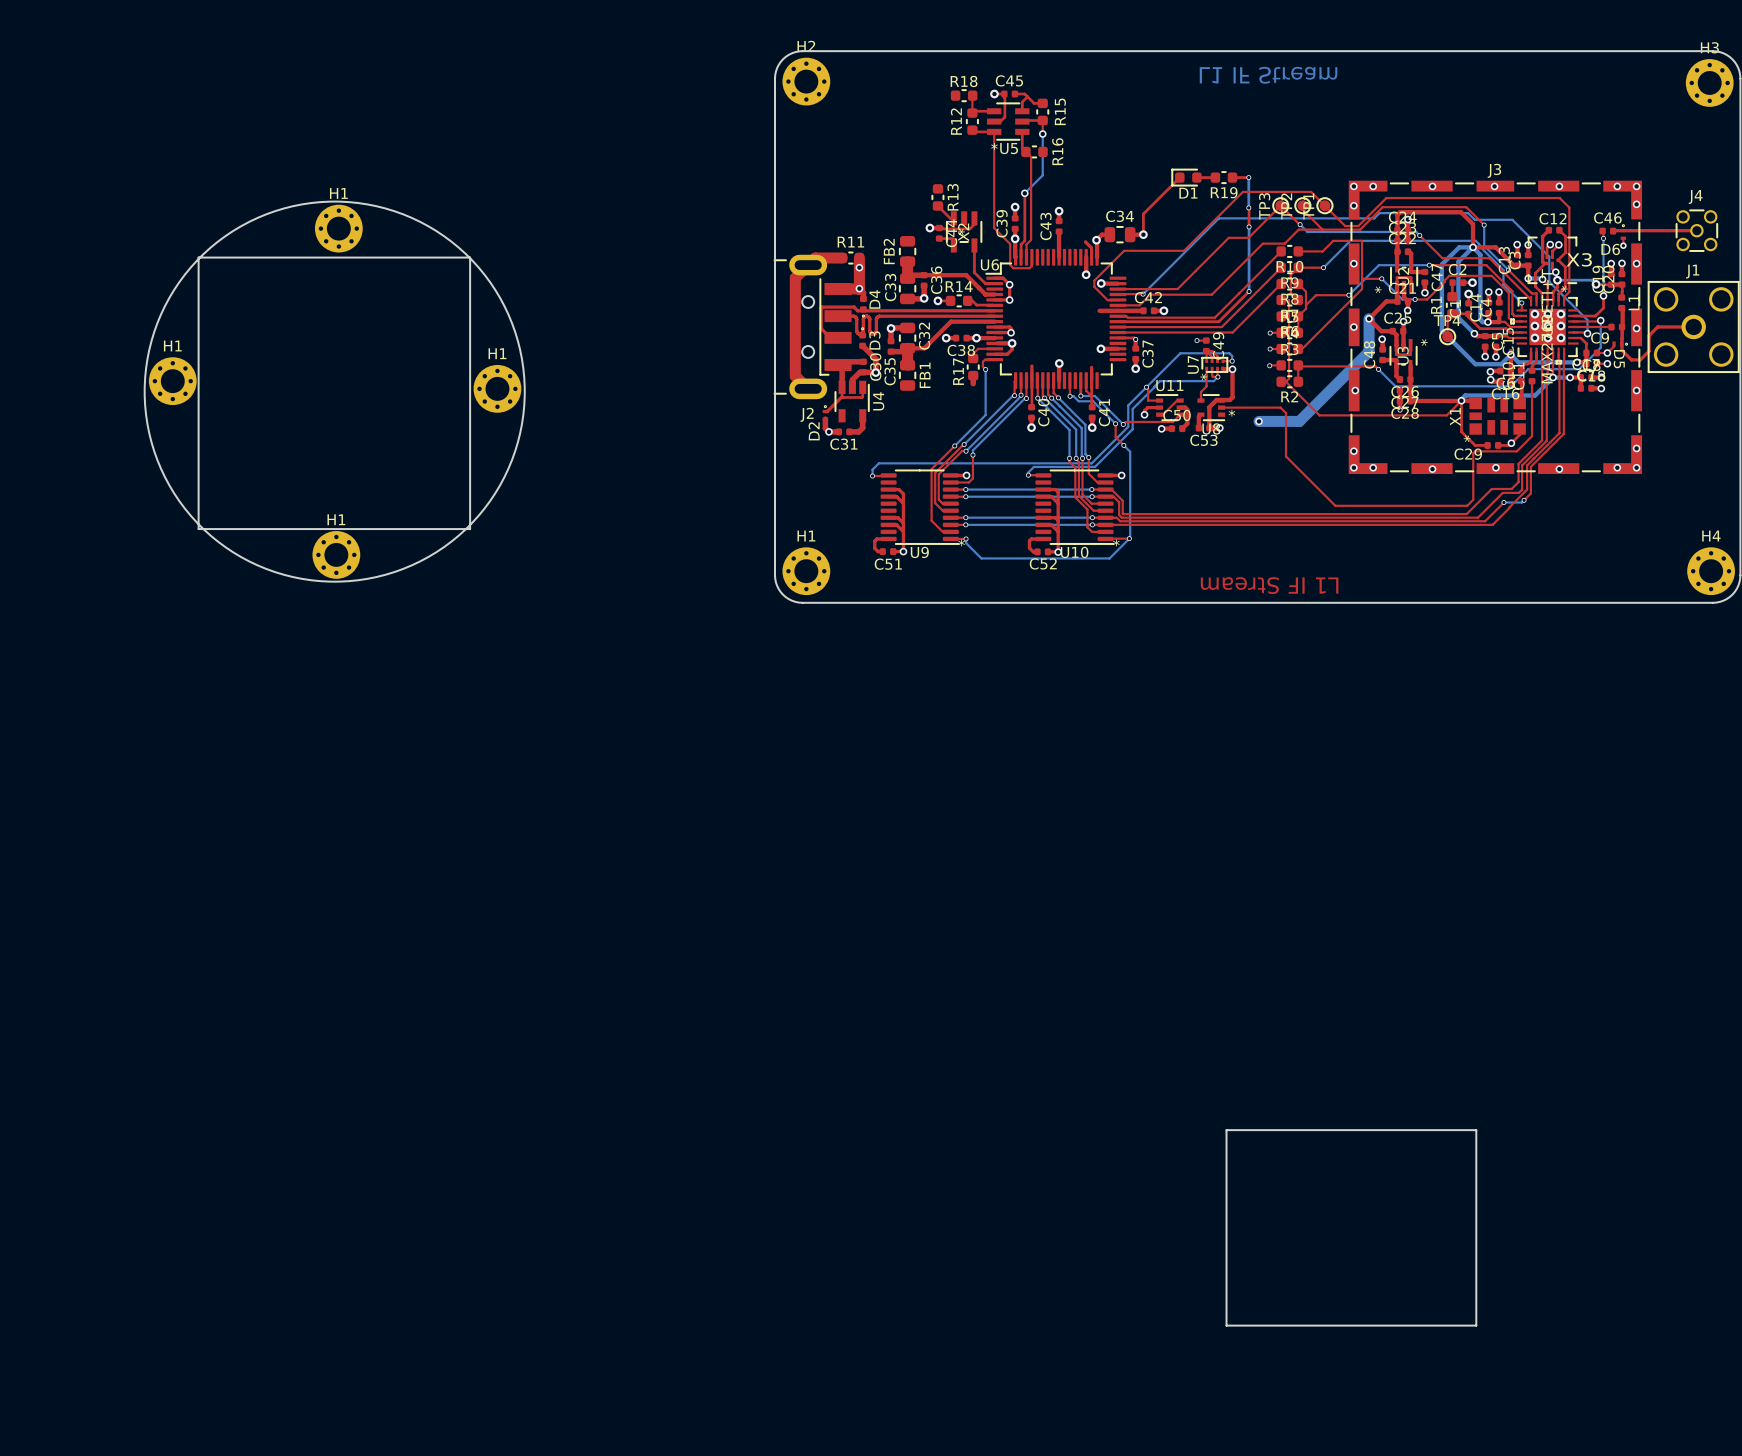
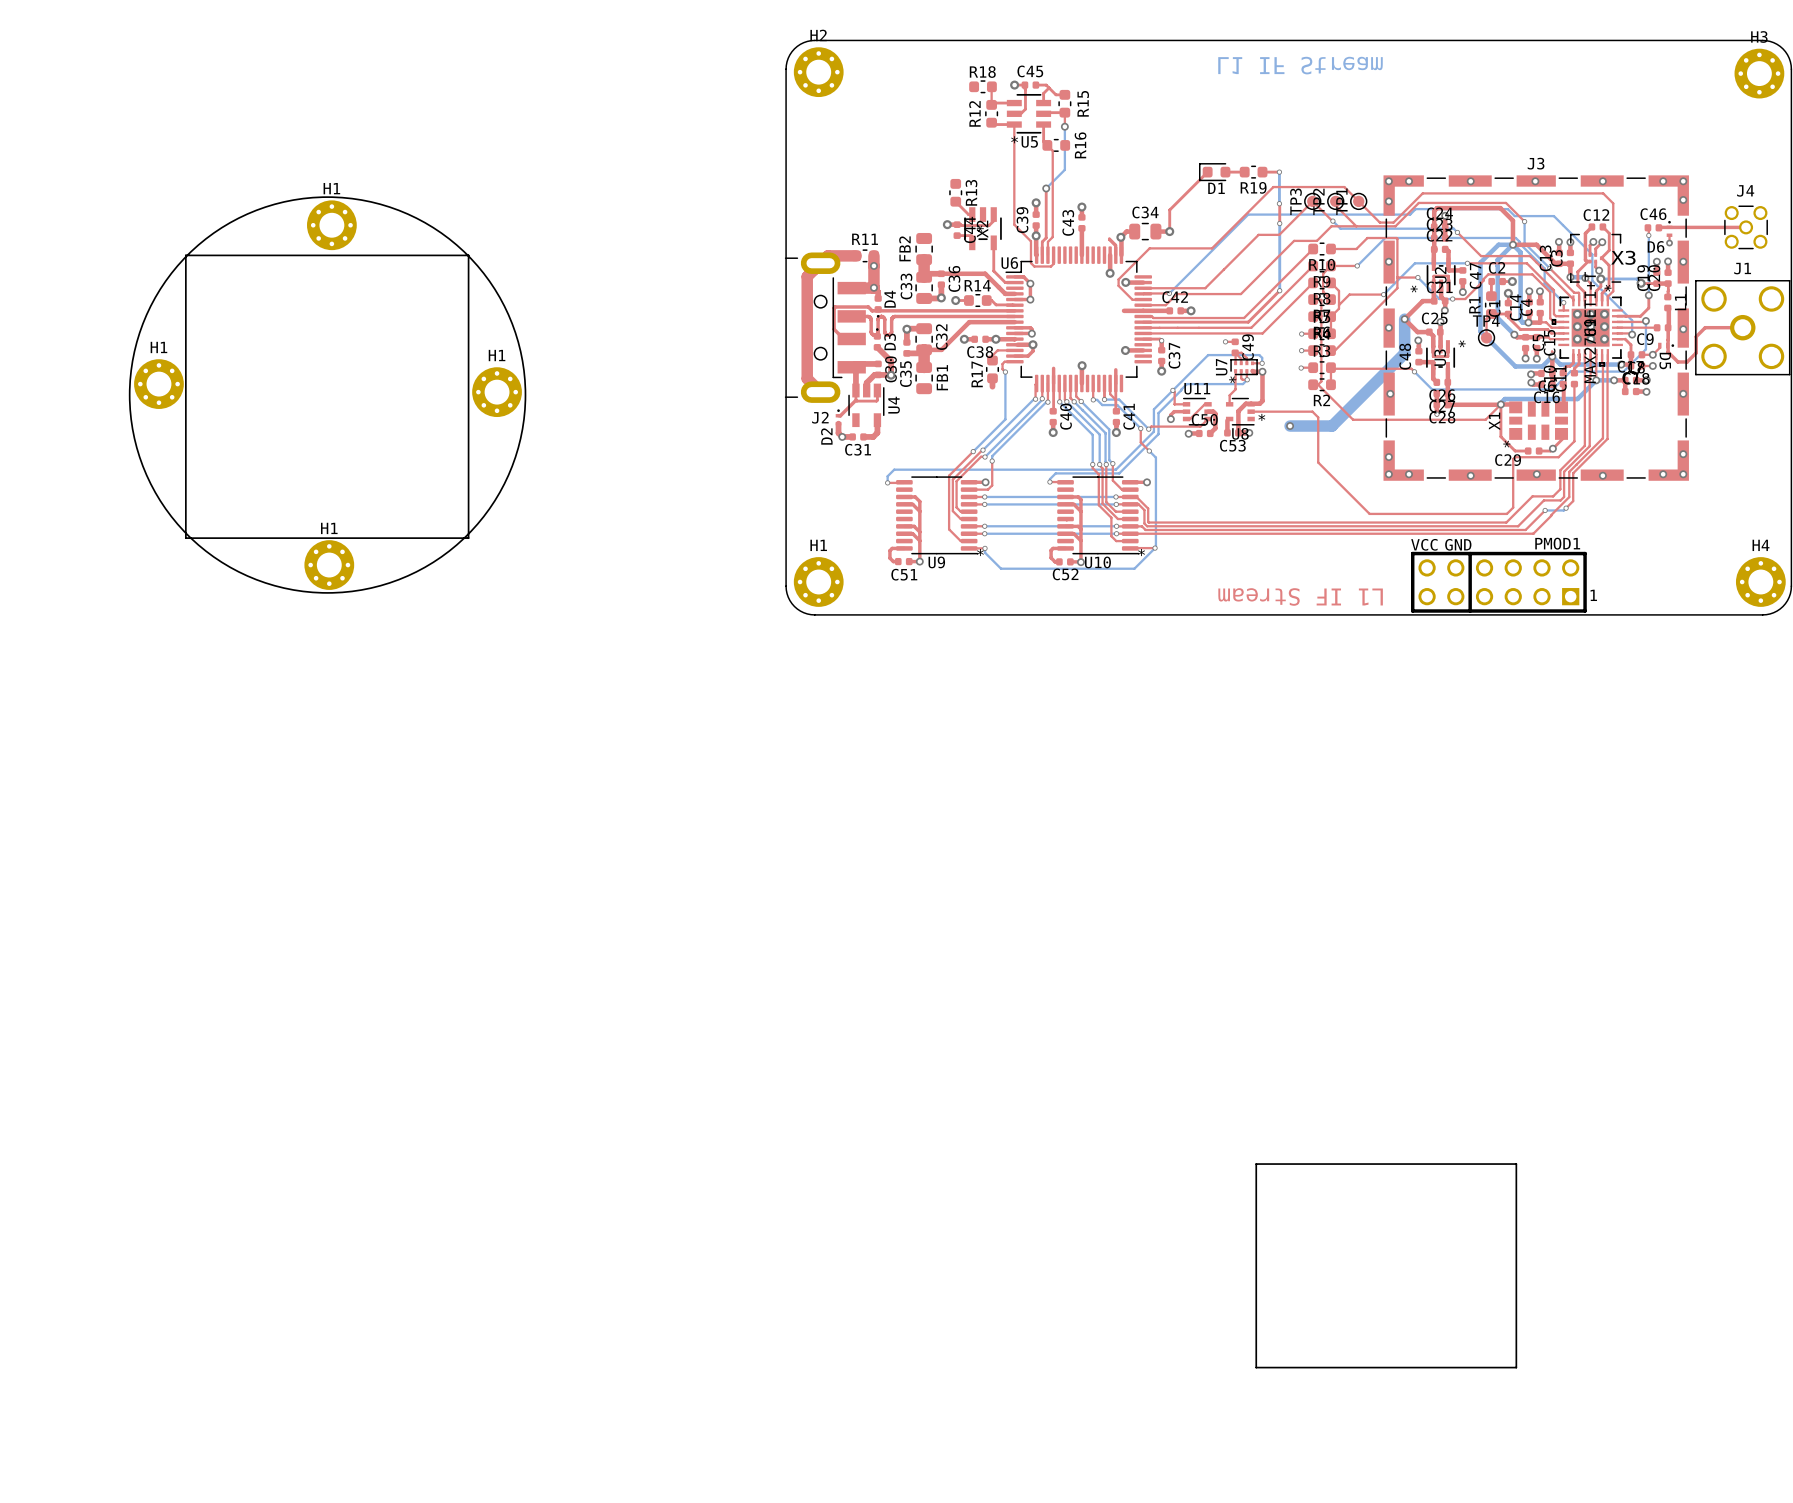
PMOD1: none -> (1498, 582)

